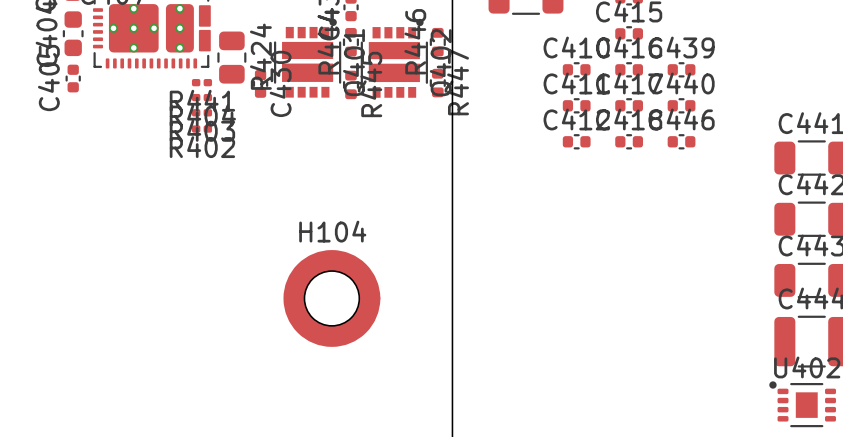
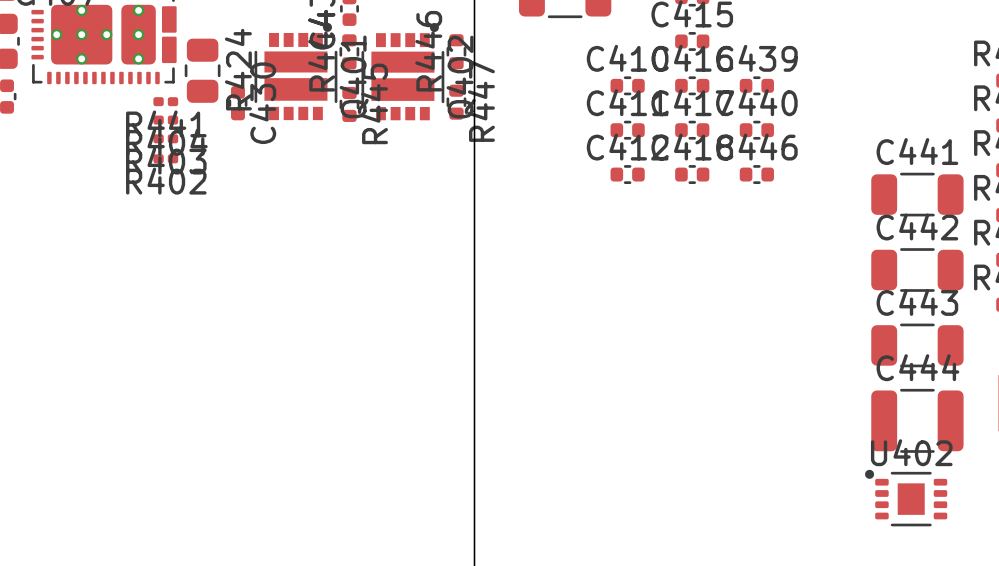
H104: (331, 298) -> none

